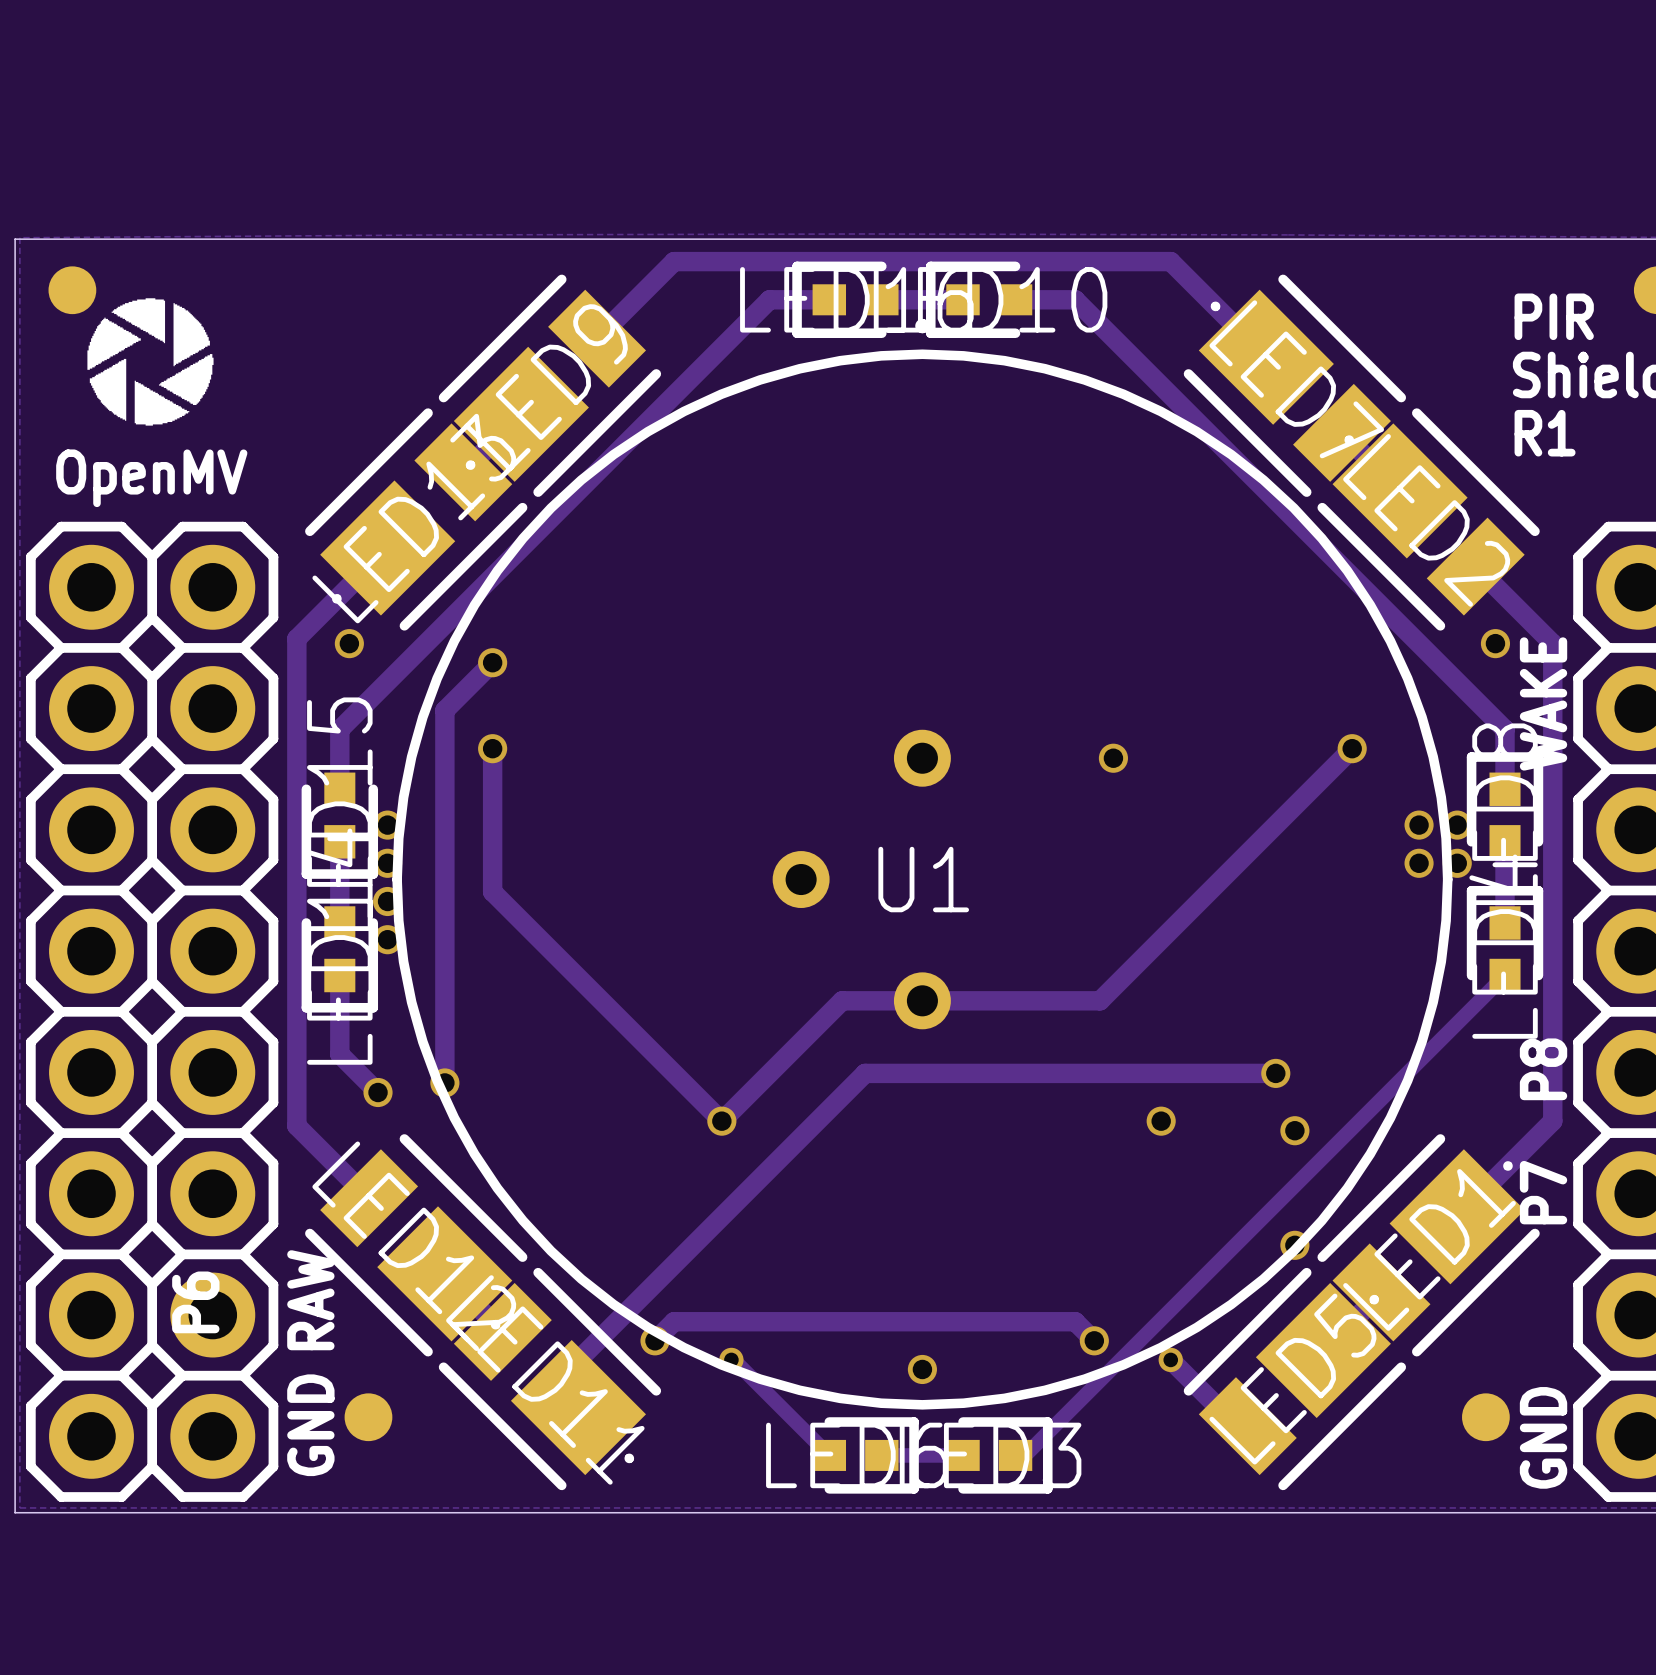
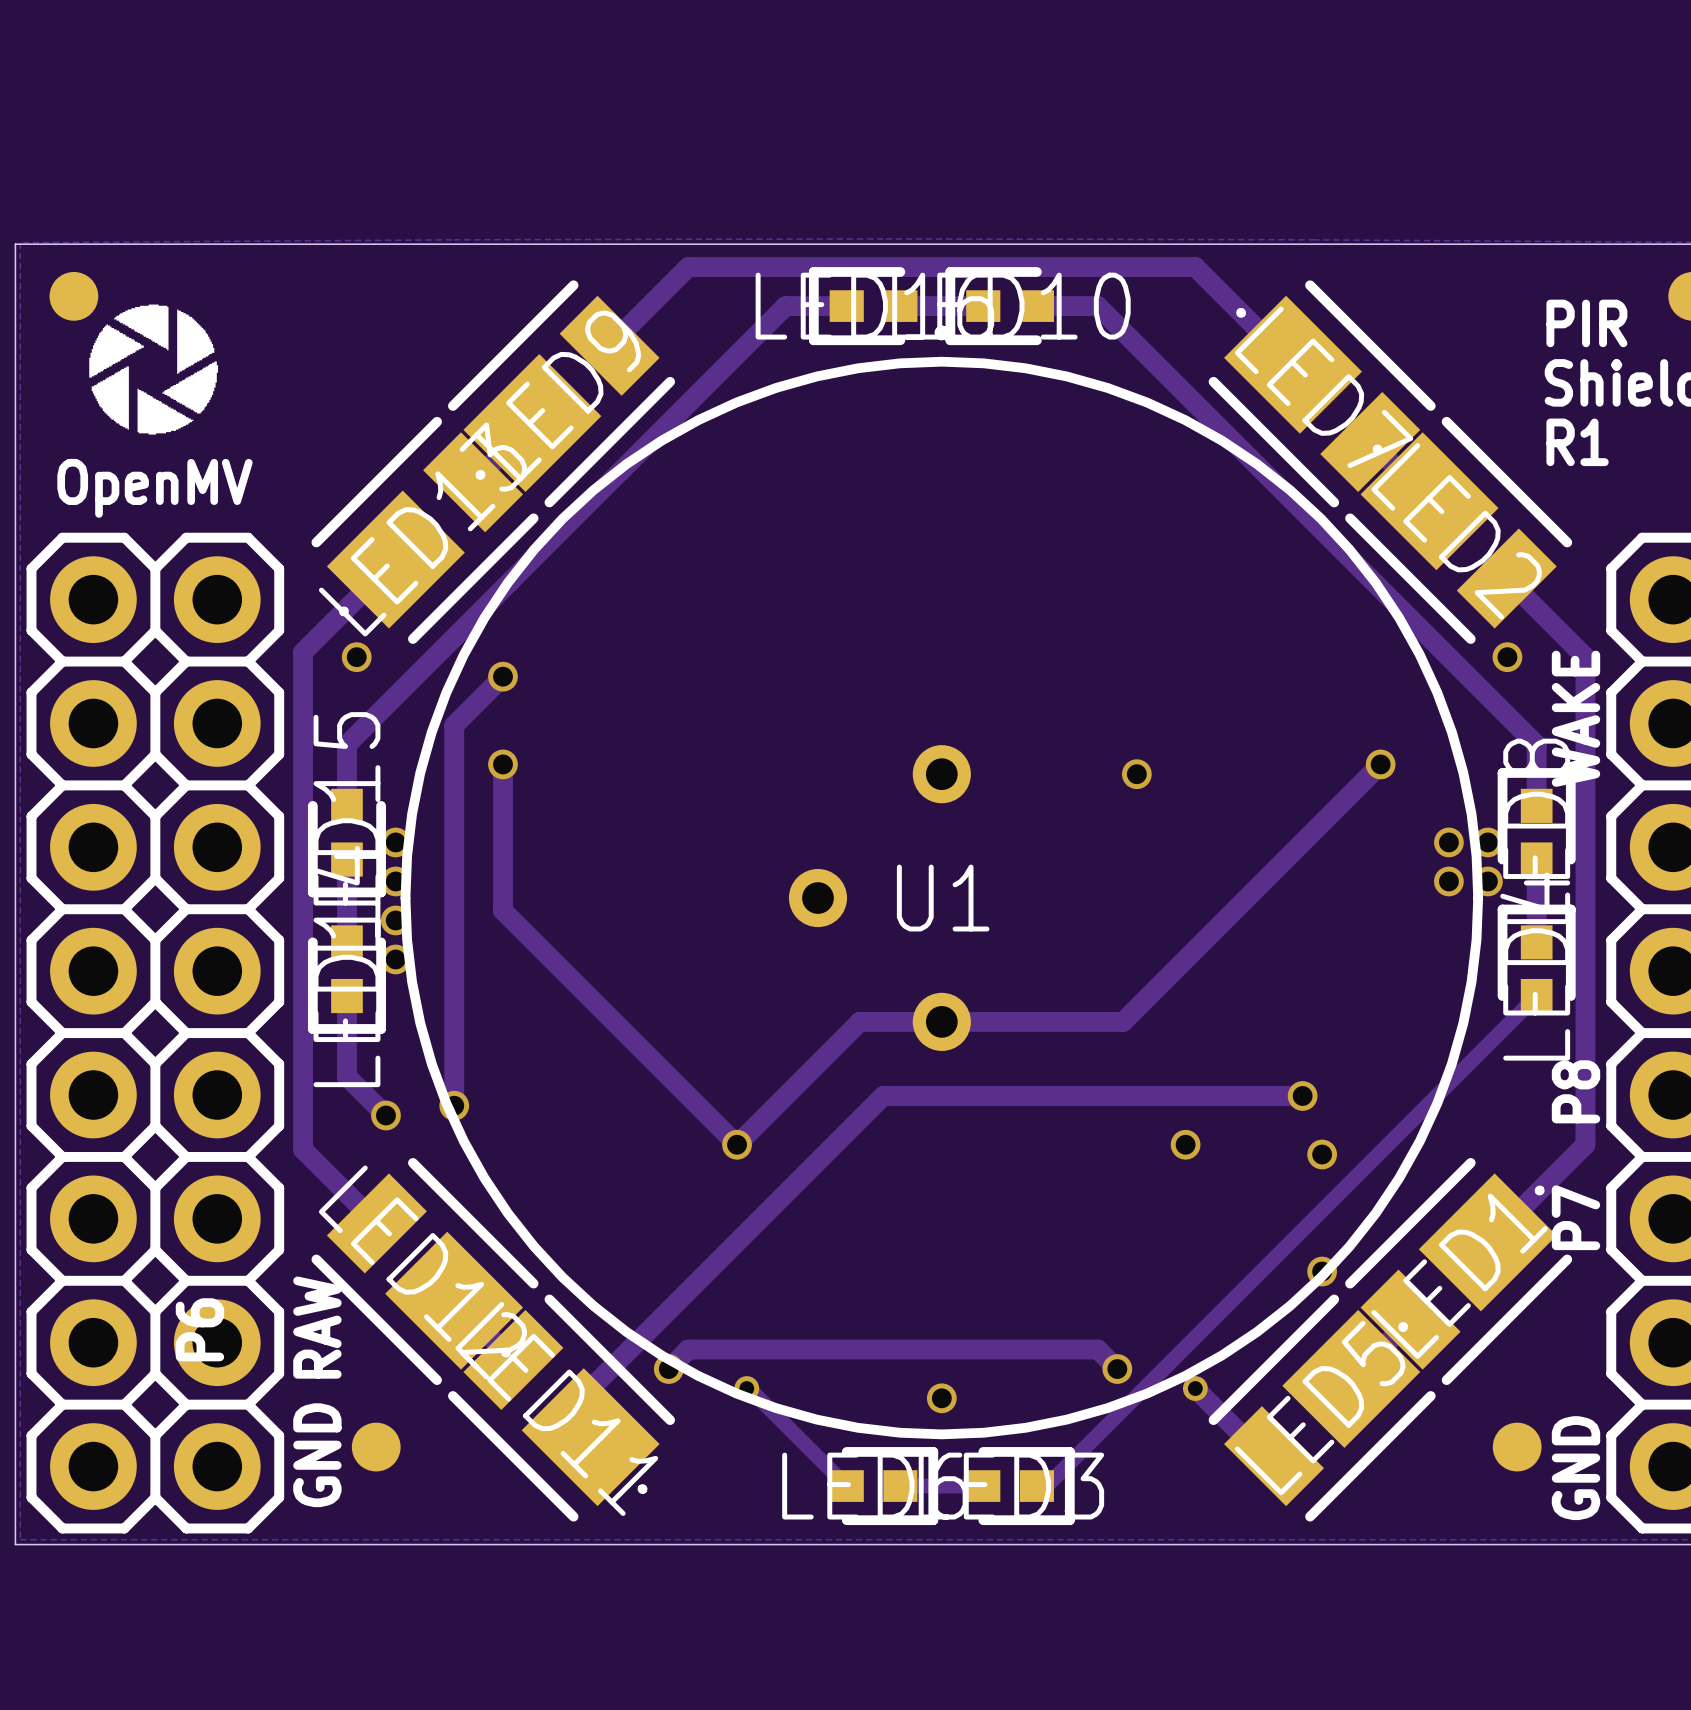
via position: (1495, 643) -> (1507, 657)

